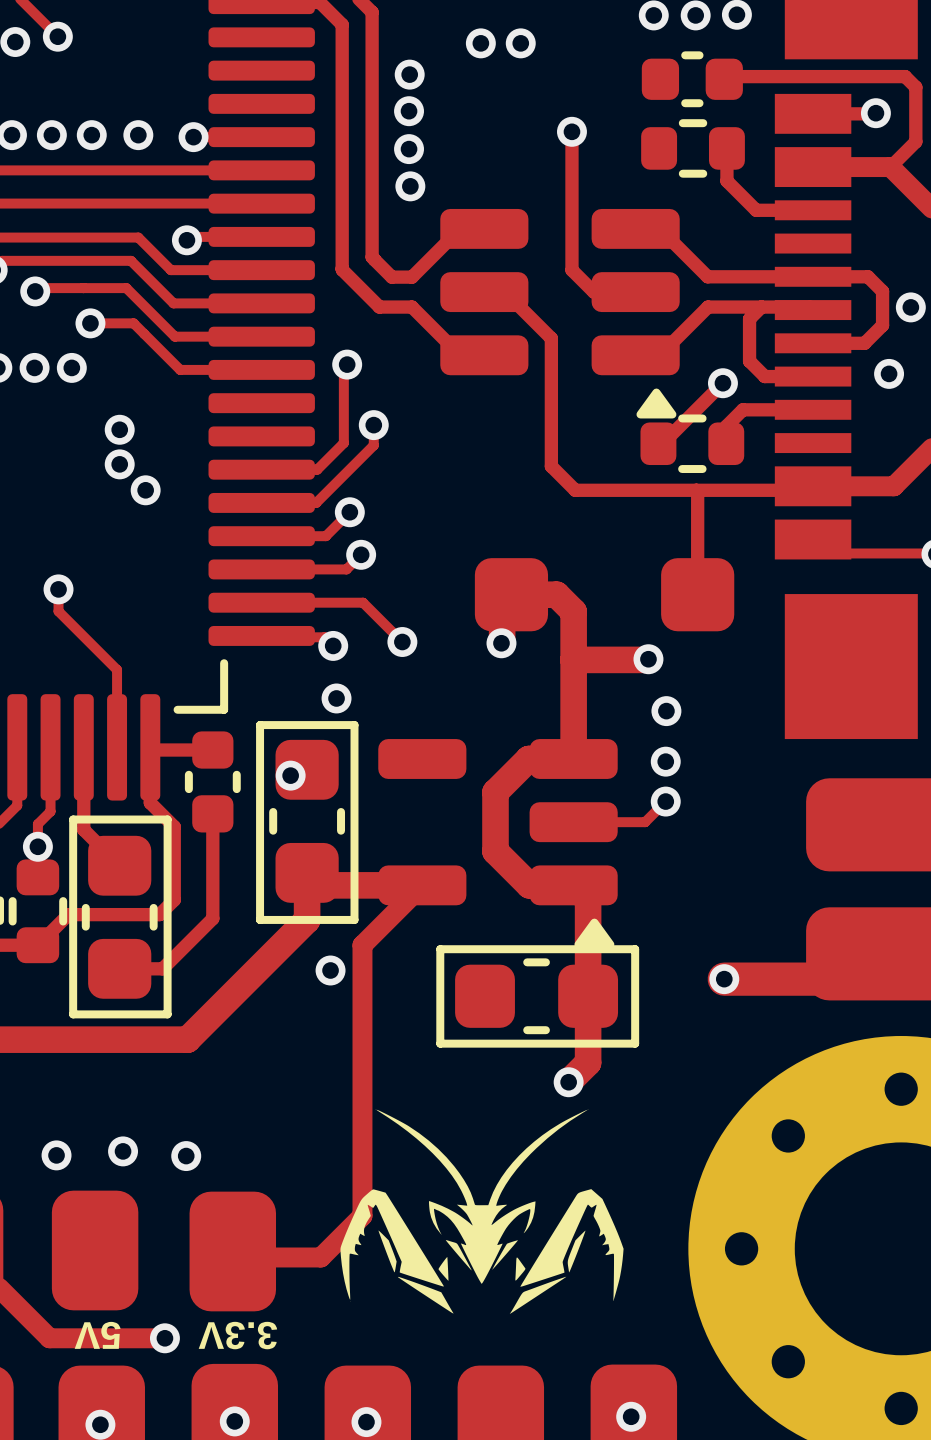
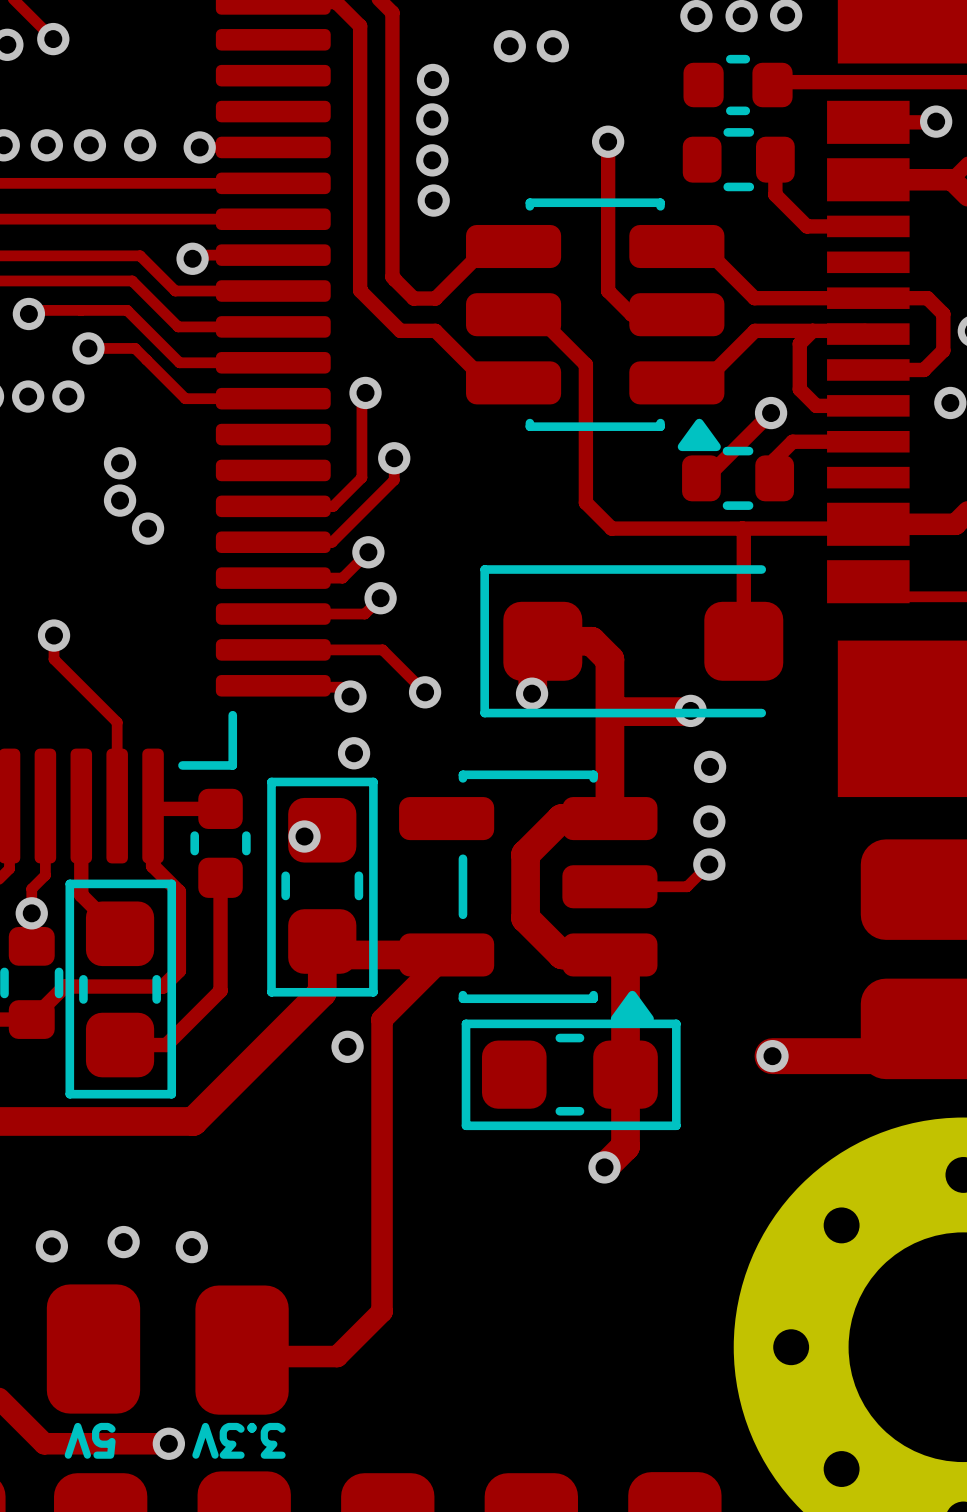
part footprint: [440, 208, 680, 419] -> [466, 198, 725, 452]
part footprint: [474, 558, 735, 632] -> [480, 565, 784, 718]
part footprint: [378, 739, 618, 949] -> [399, 770, 658, 1024]
drawing: [340, 1109, 624, 1314] -> none

